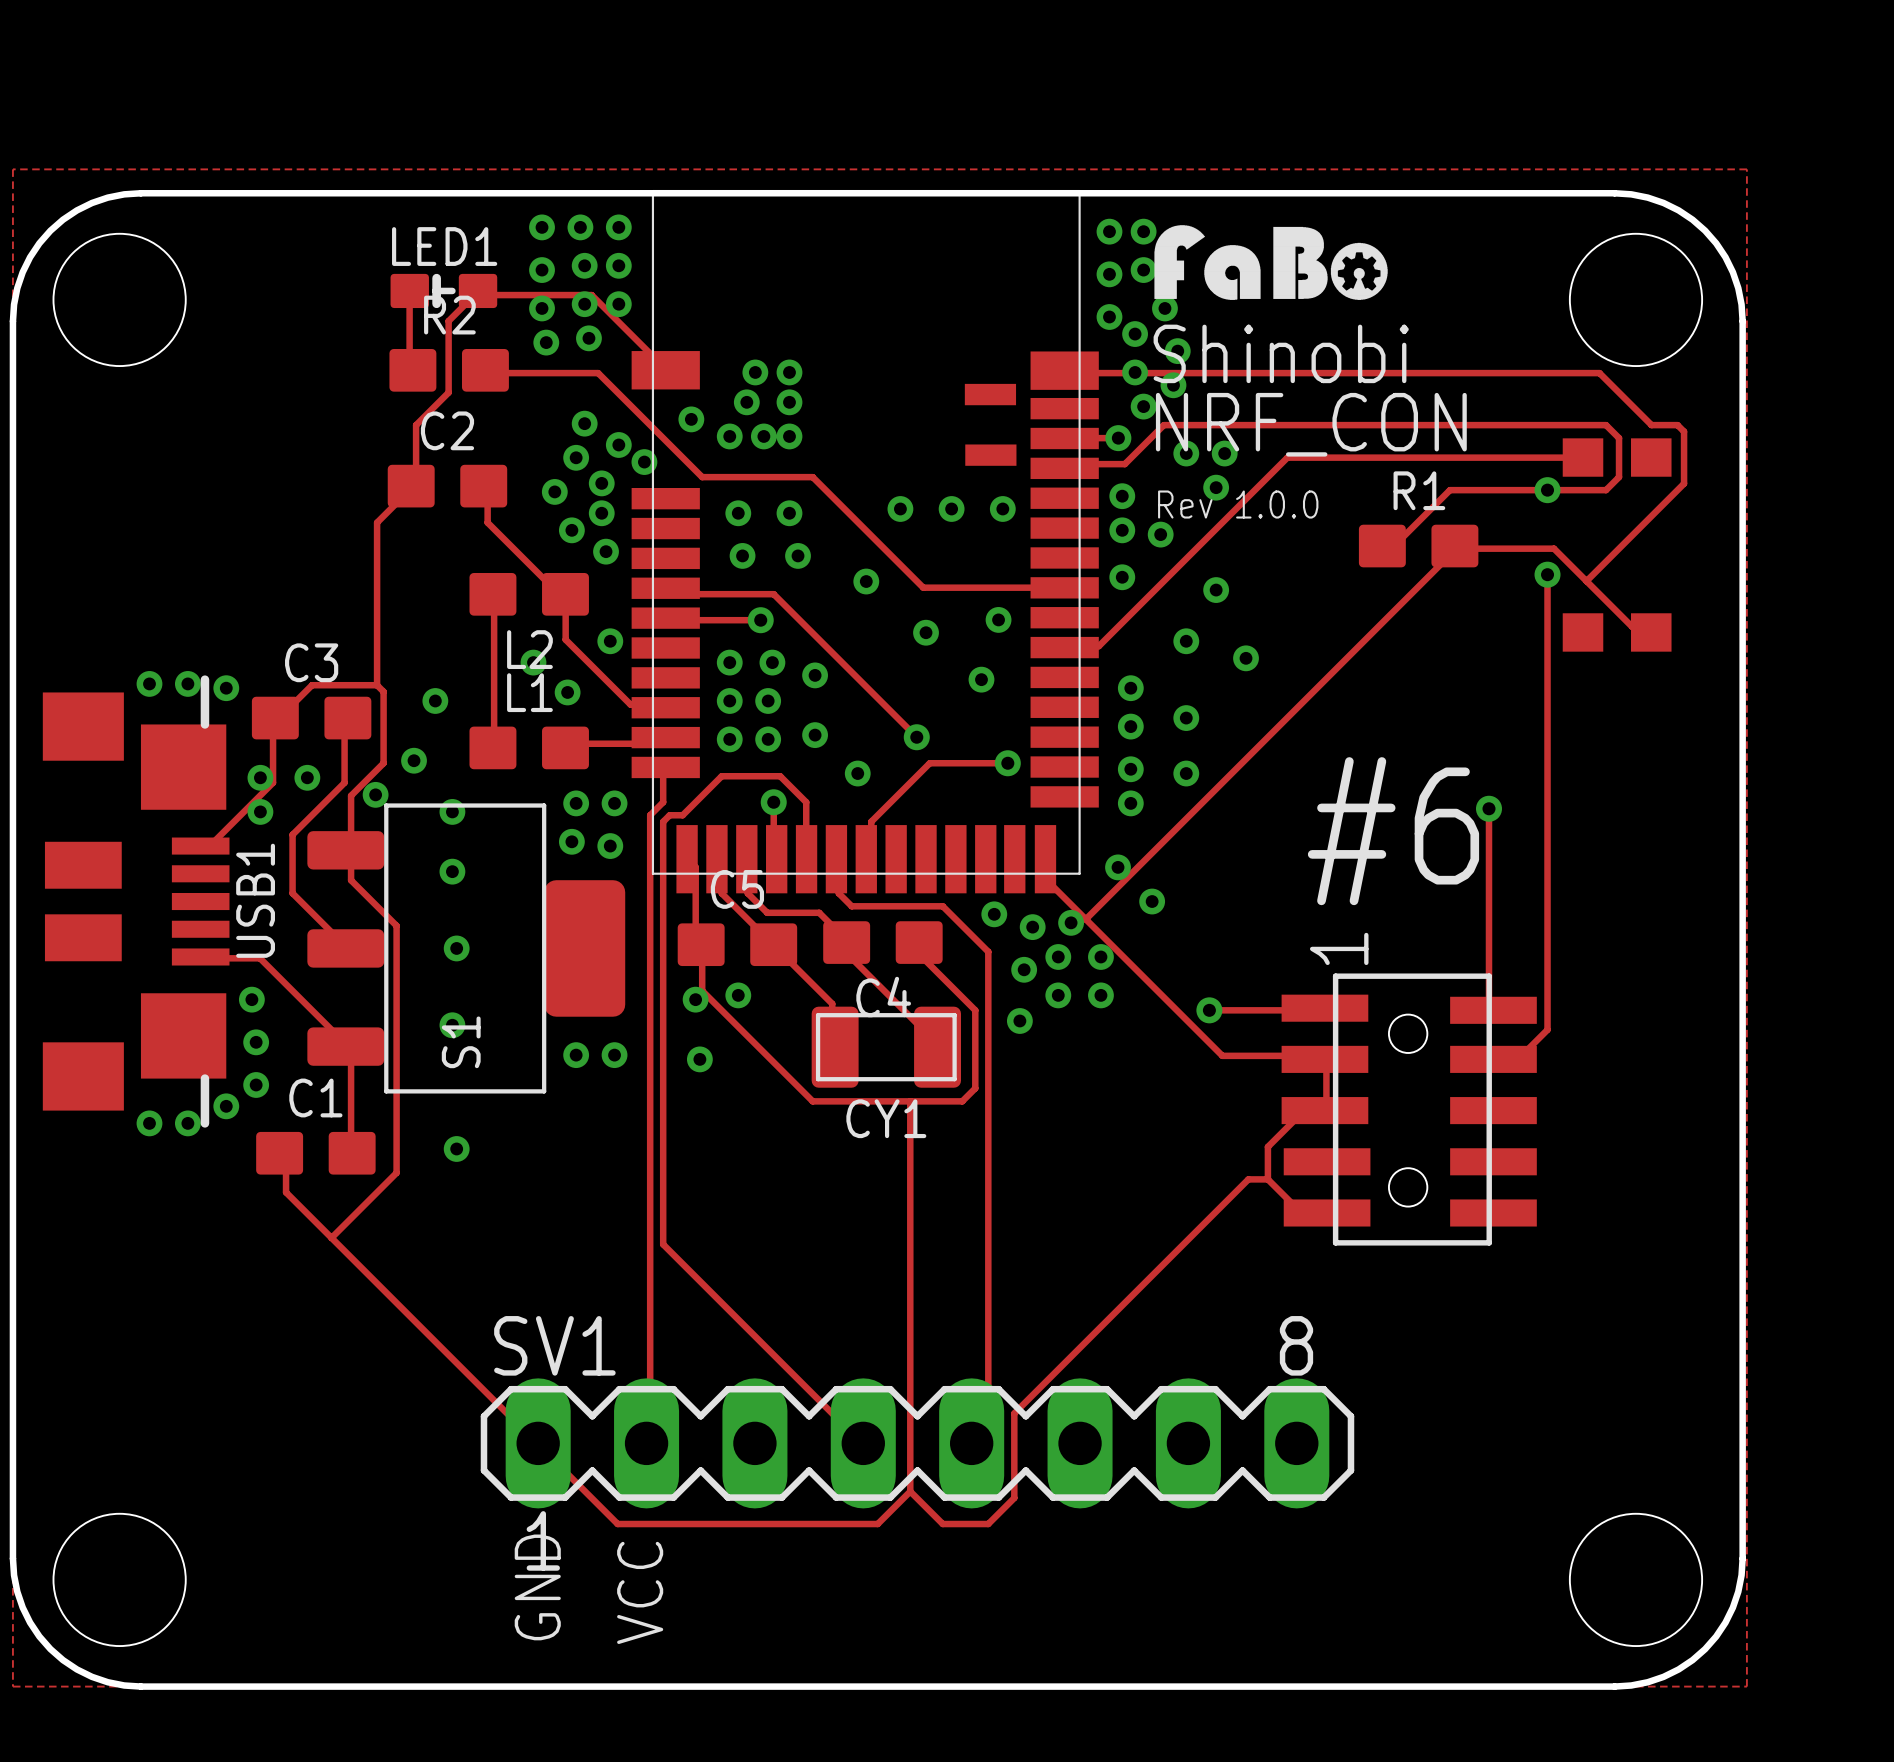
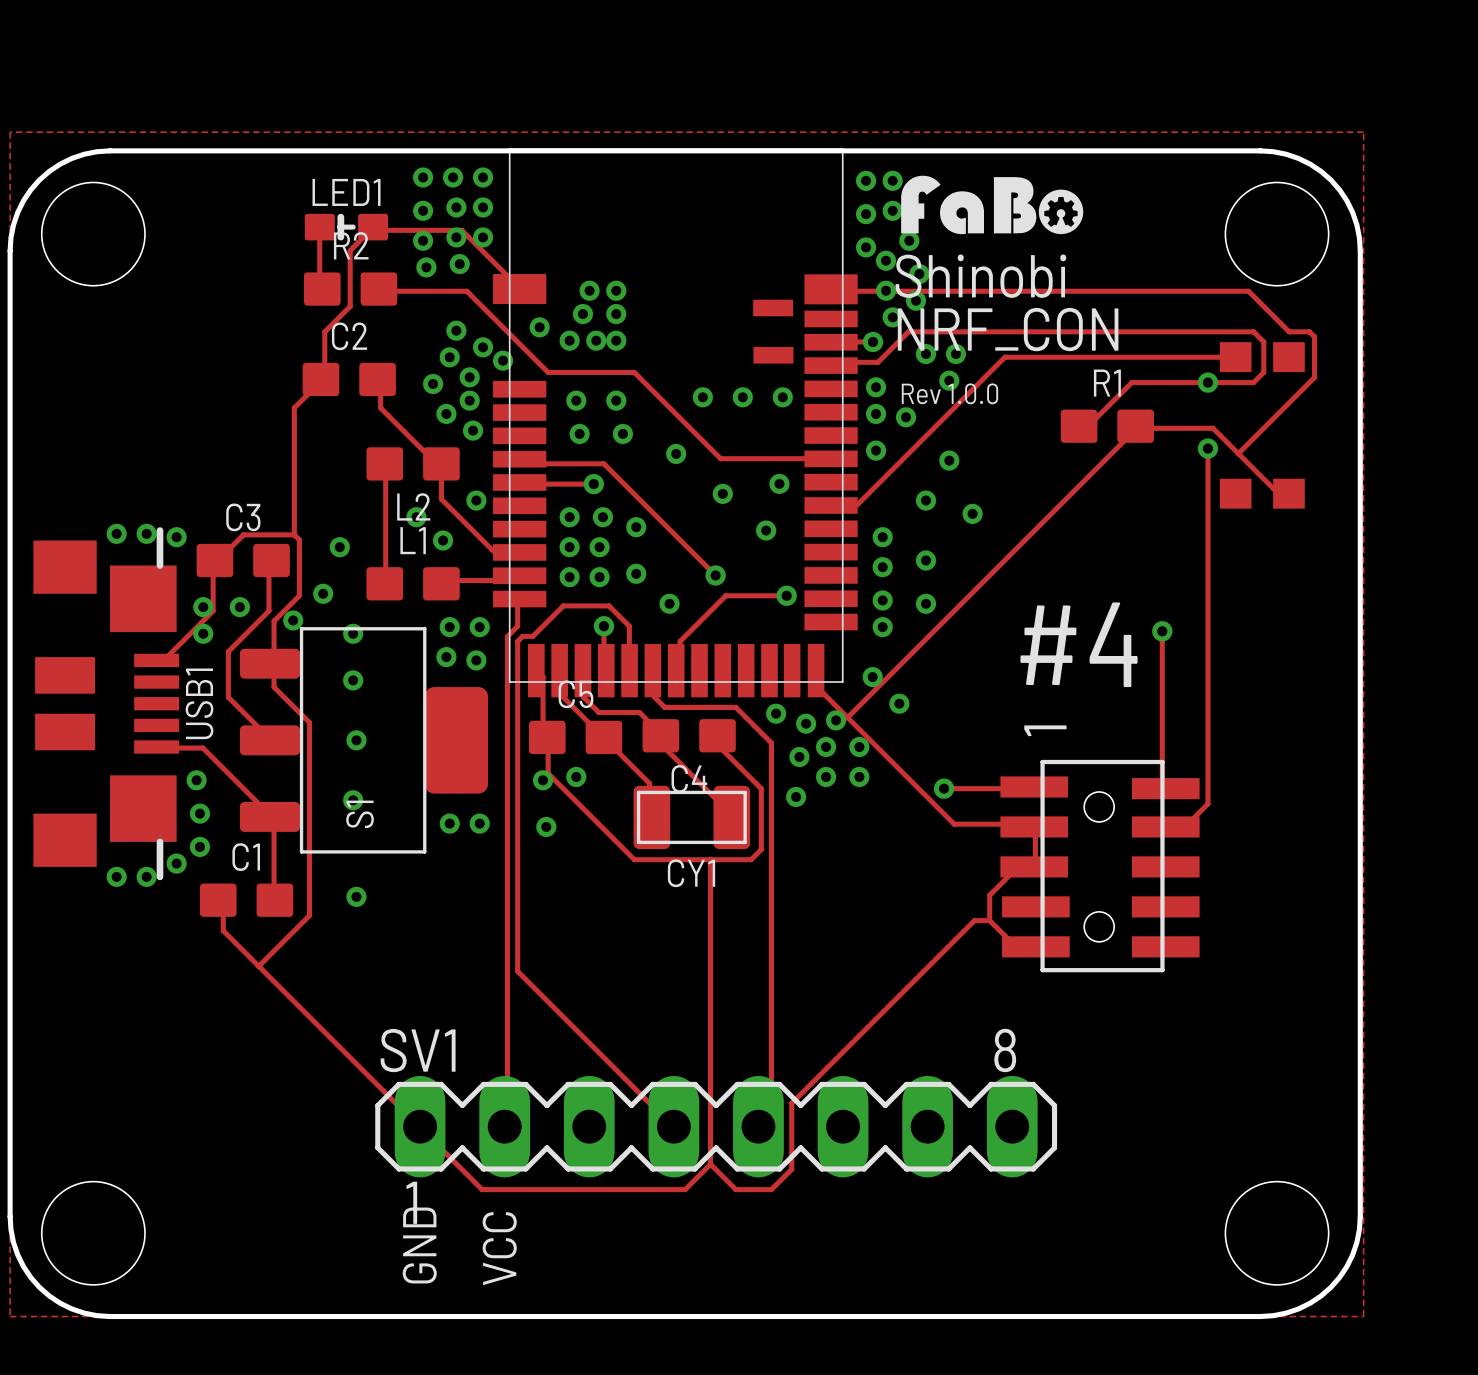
text: #6 (1393, 831) -> #4 (1078, 644)

